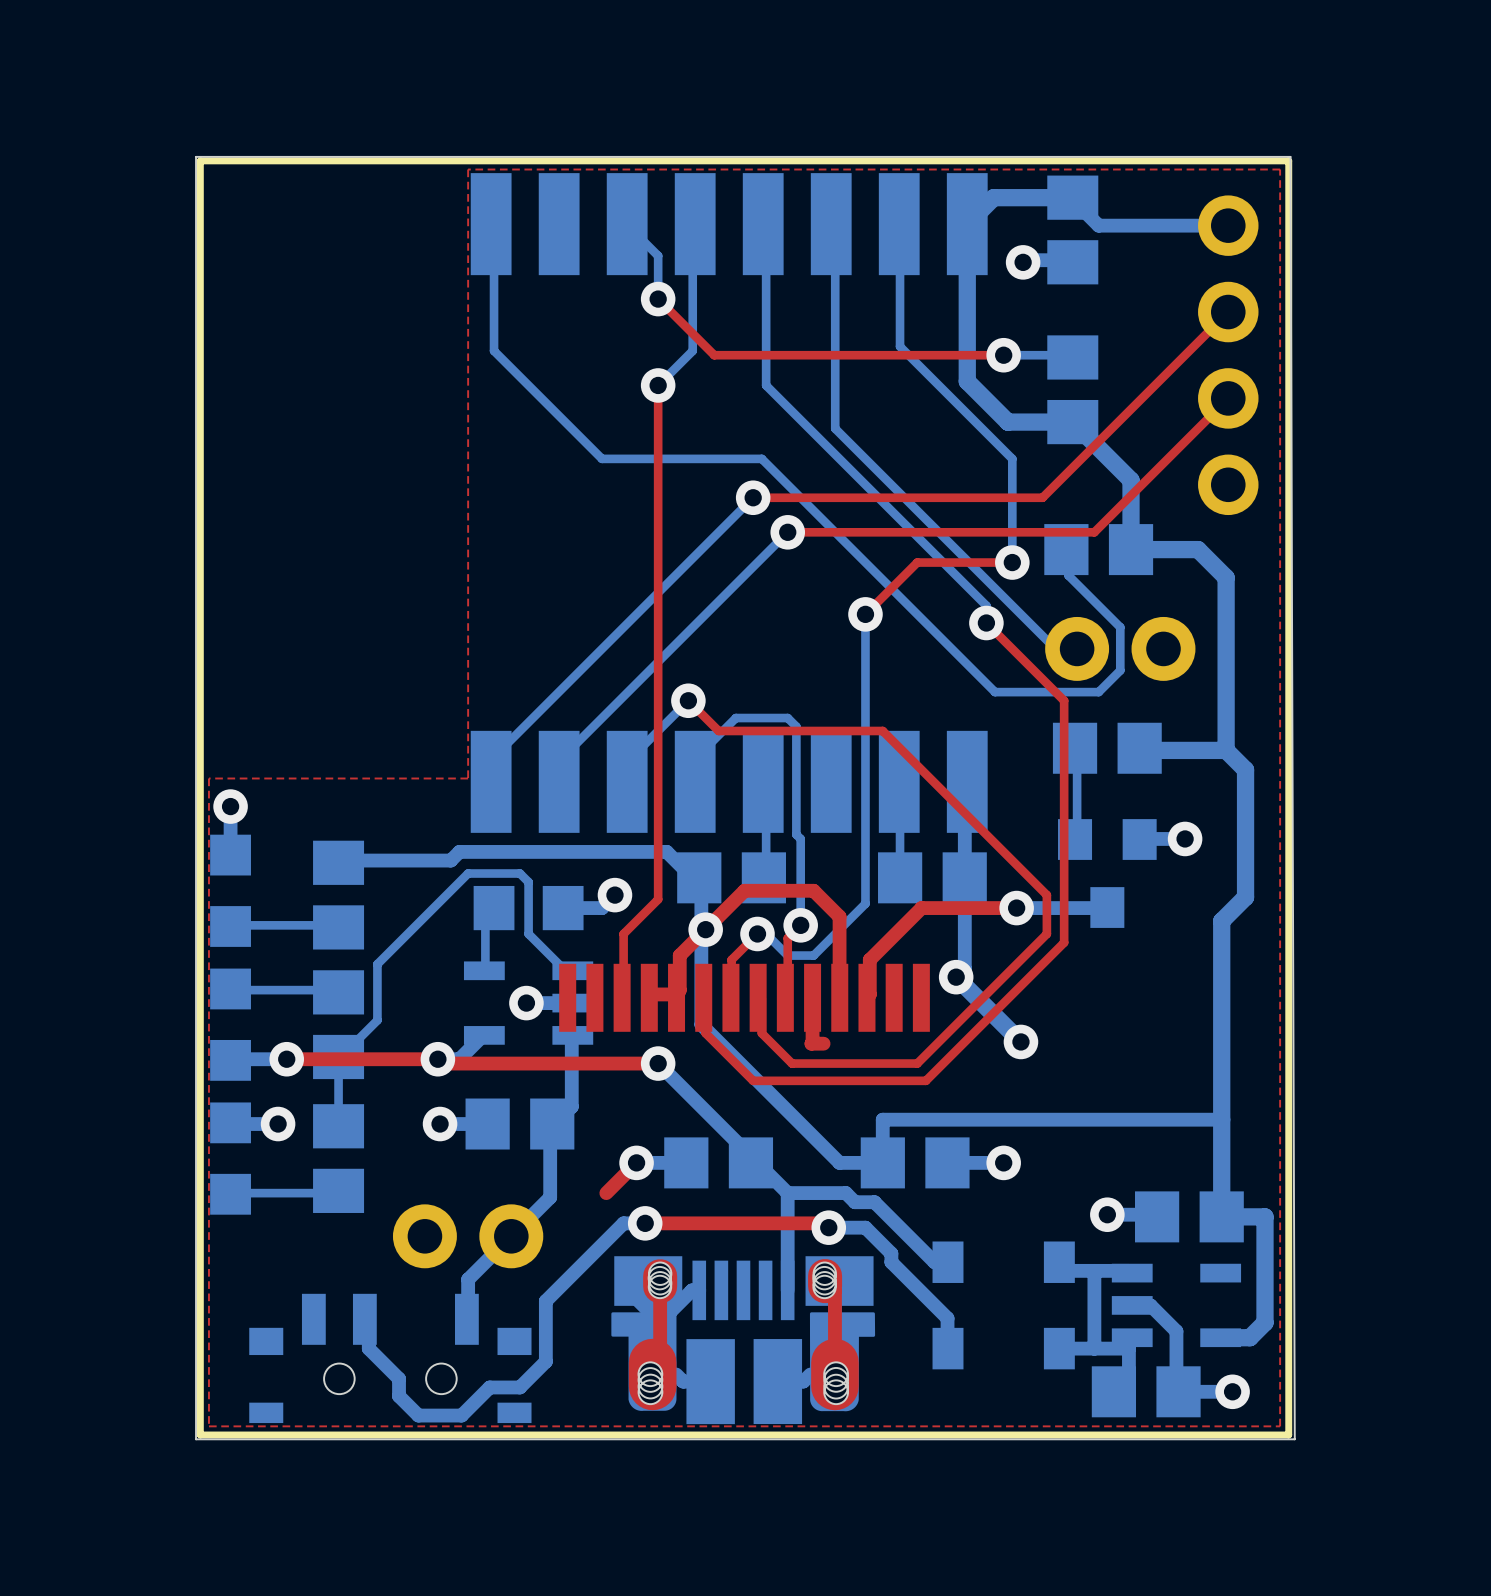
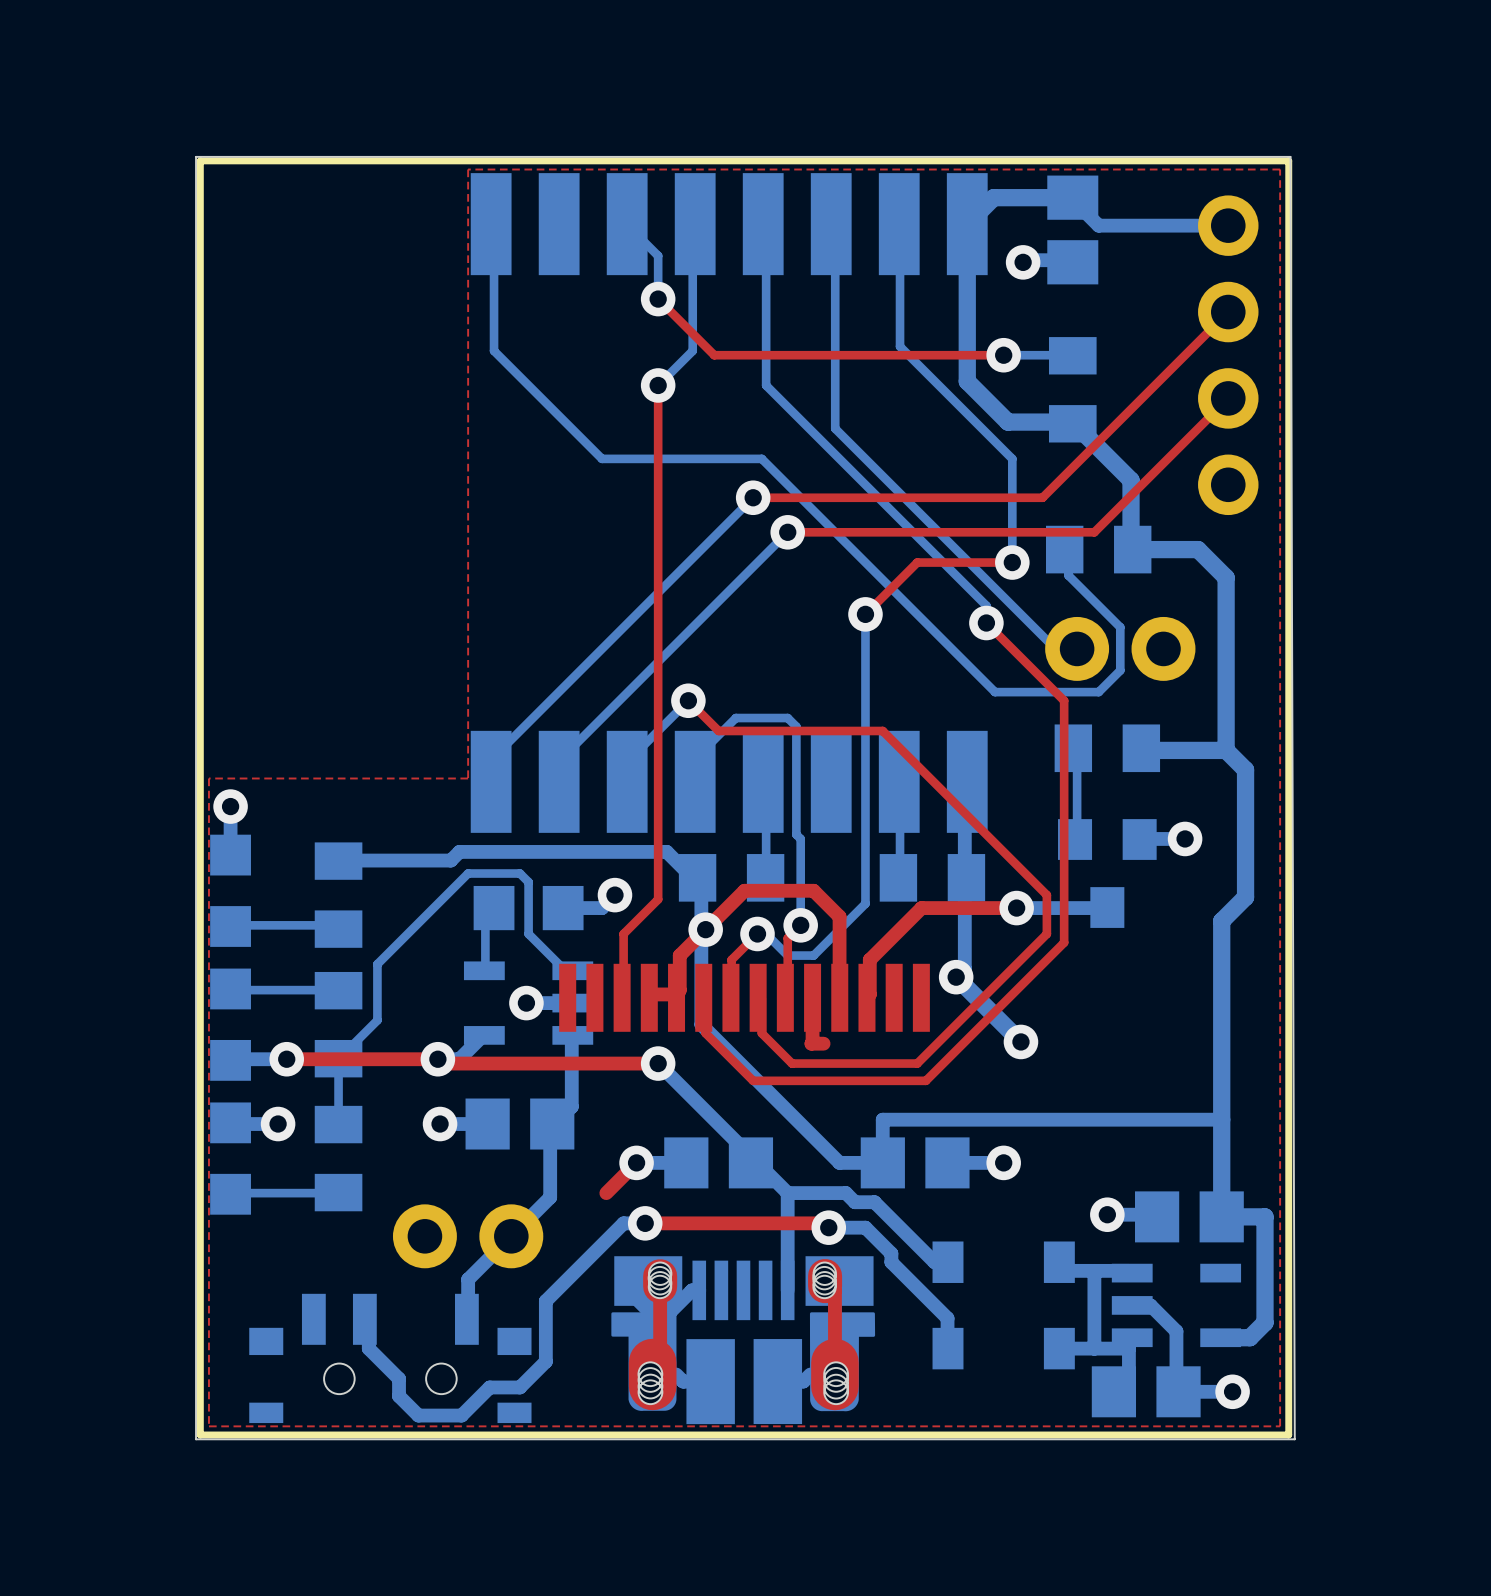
part footprint: [1047, 335, 1099, 445] -> [1048, 337, 1097, 443]
part footprint: [1044, 524, 1154, 576] -> [1045, 525, 1152, 574]
part footprint: [1052, 722, 1162, 774] -> [1054, 724, 1161, 773]
part footprint: [313, 840, 365, 950] -> [314, 842, 363, 948]
part footprint: [677, 852, 787, 904] -> [678, 854, 785, 902]
part footprint: [878, 852, 987, 904] -> [879, 854, 986, 902]
part footprint: [313, 970, 365, 1080] -> [314, 971, 363, 1078]
part footprint: [313, 1104, 365, 1213] -> [314, 1105, 363, 1212]

